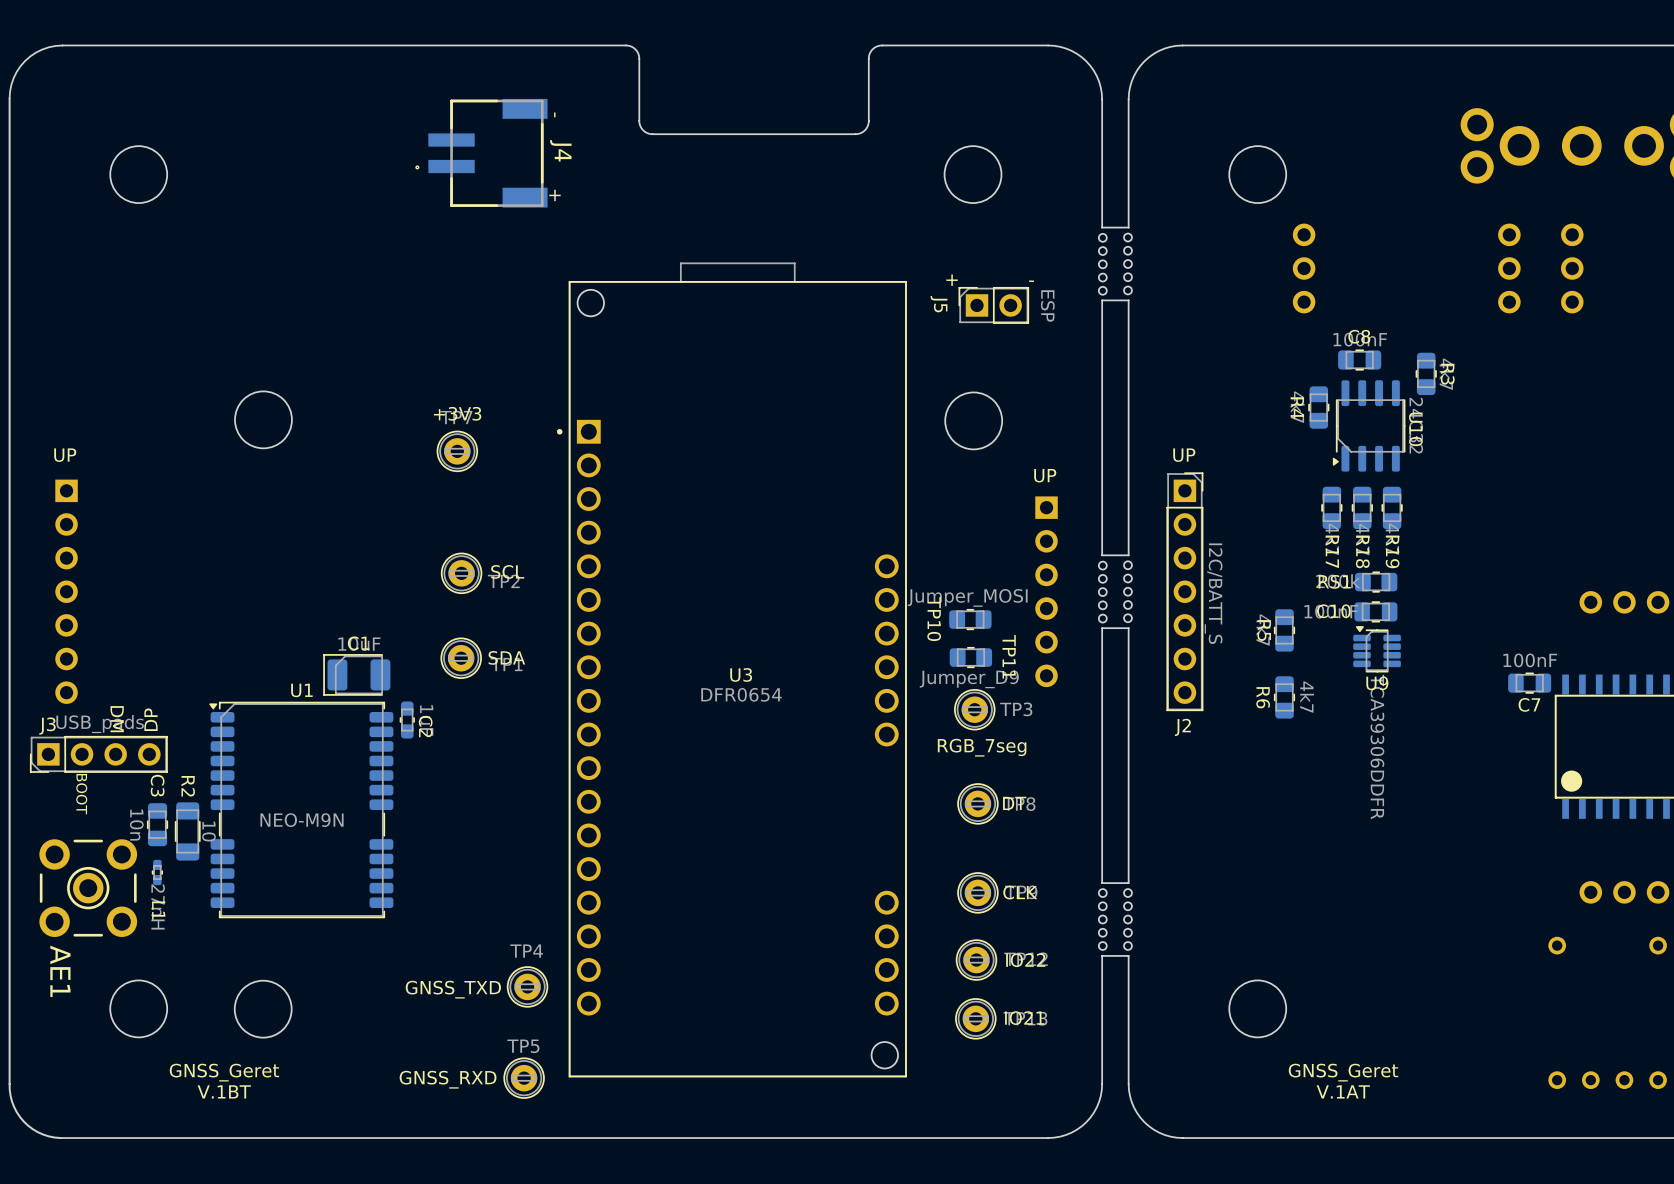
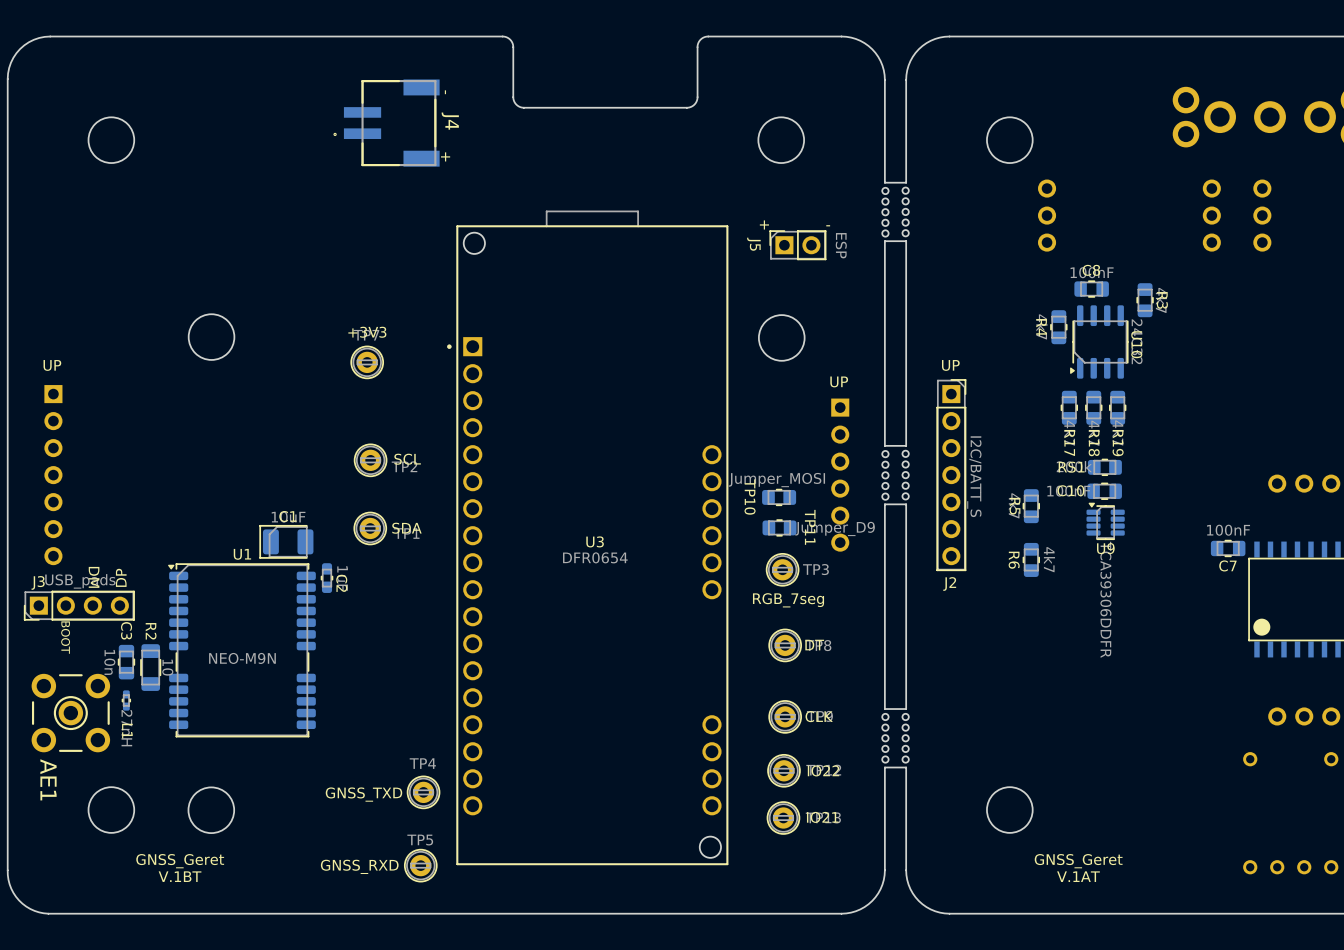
TP11 value position: Jumper_D9 (969, 679) -> Jumper_D9 (835, 528)

